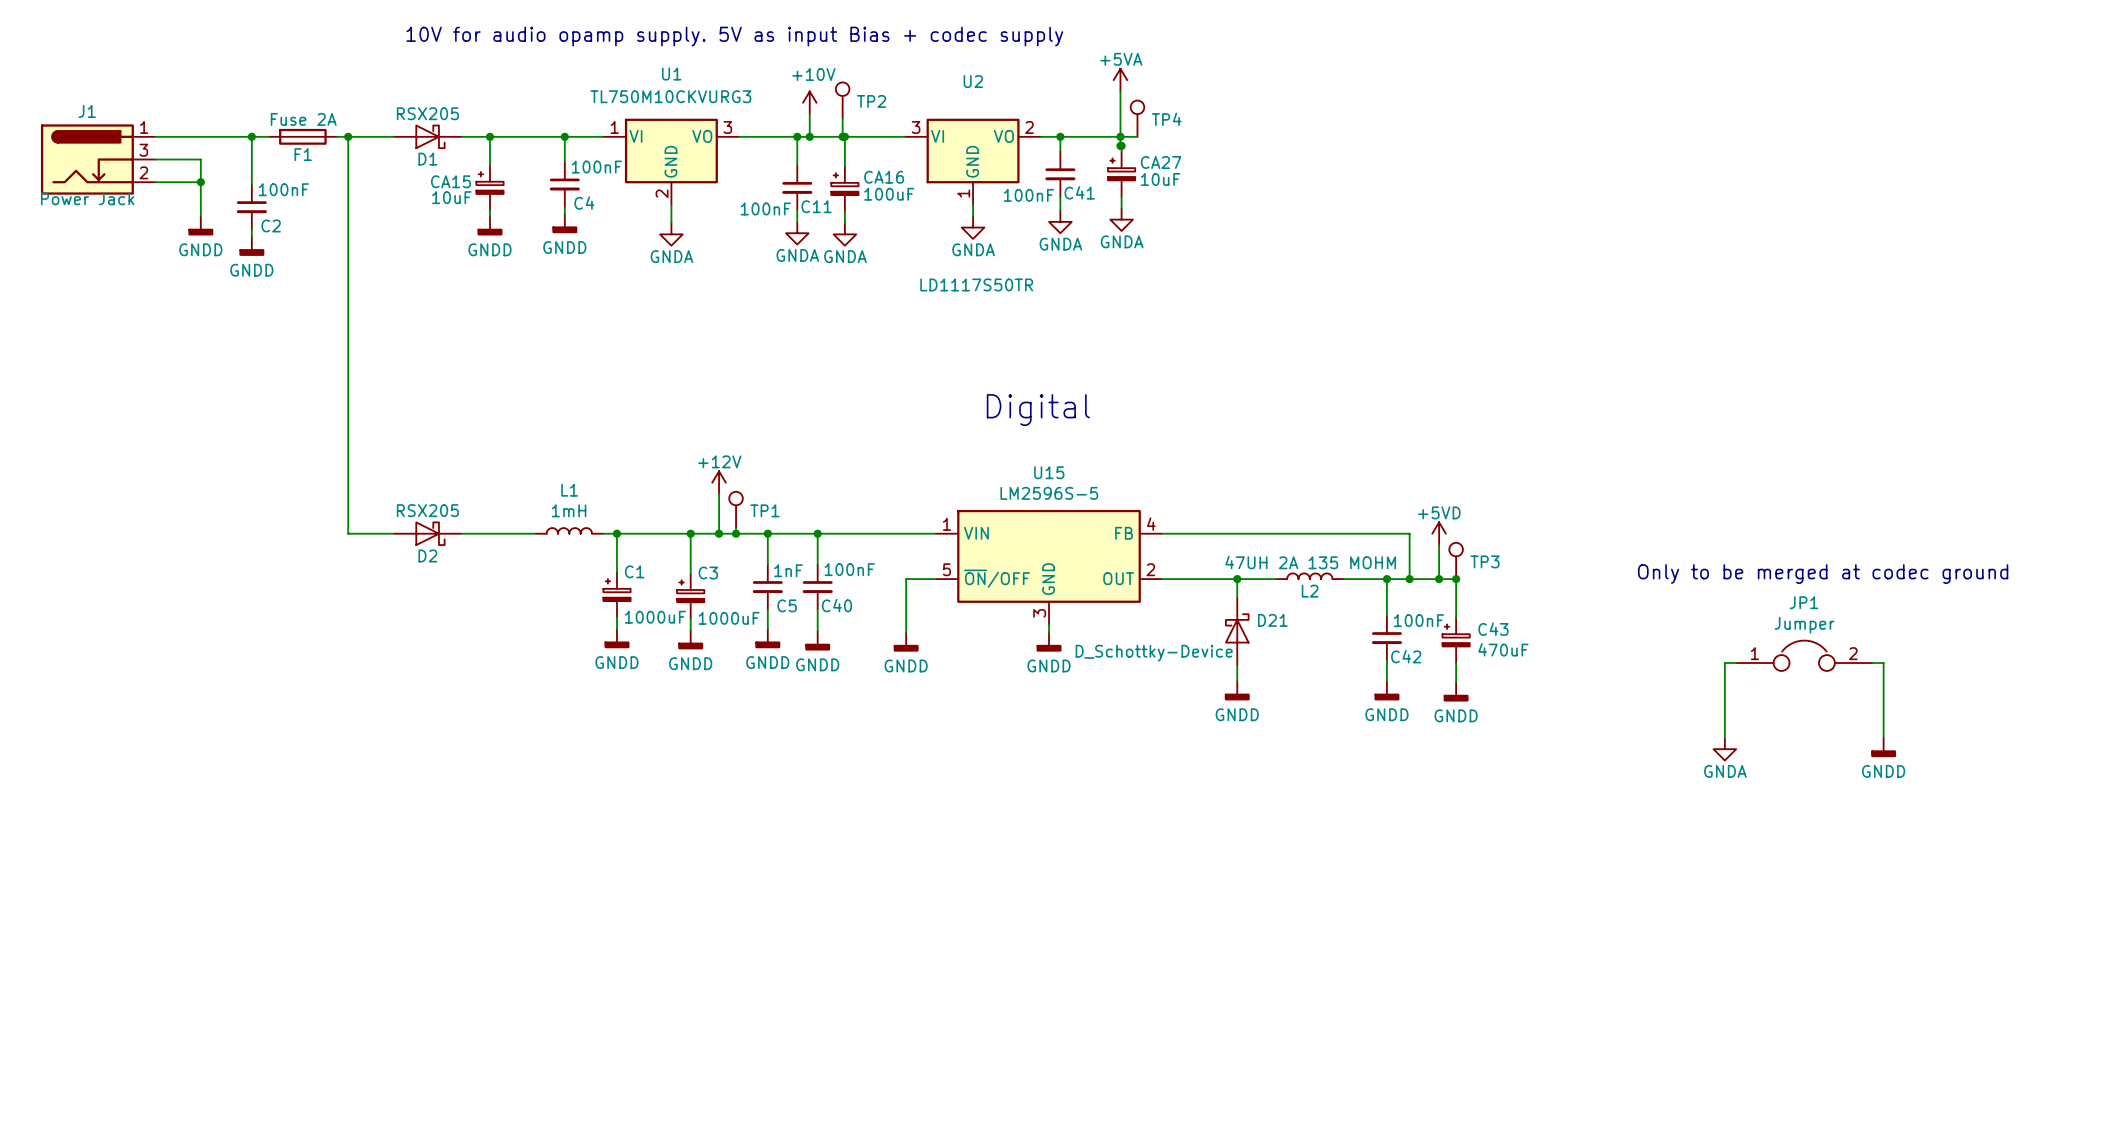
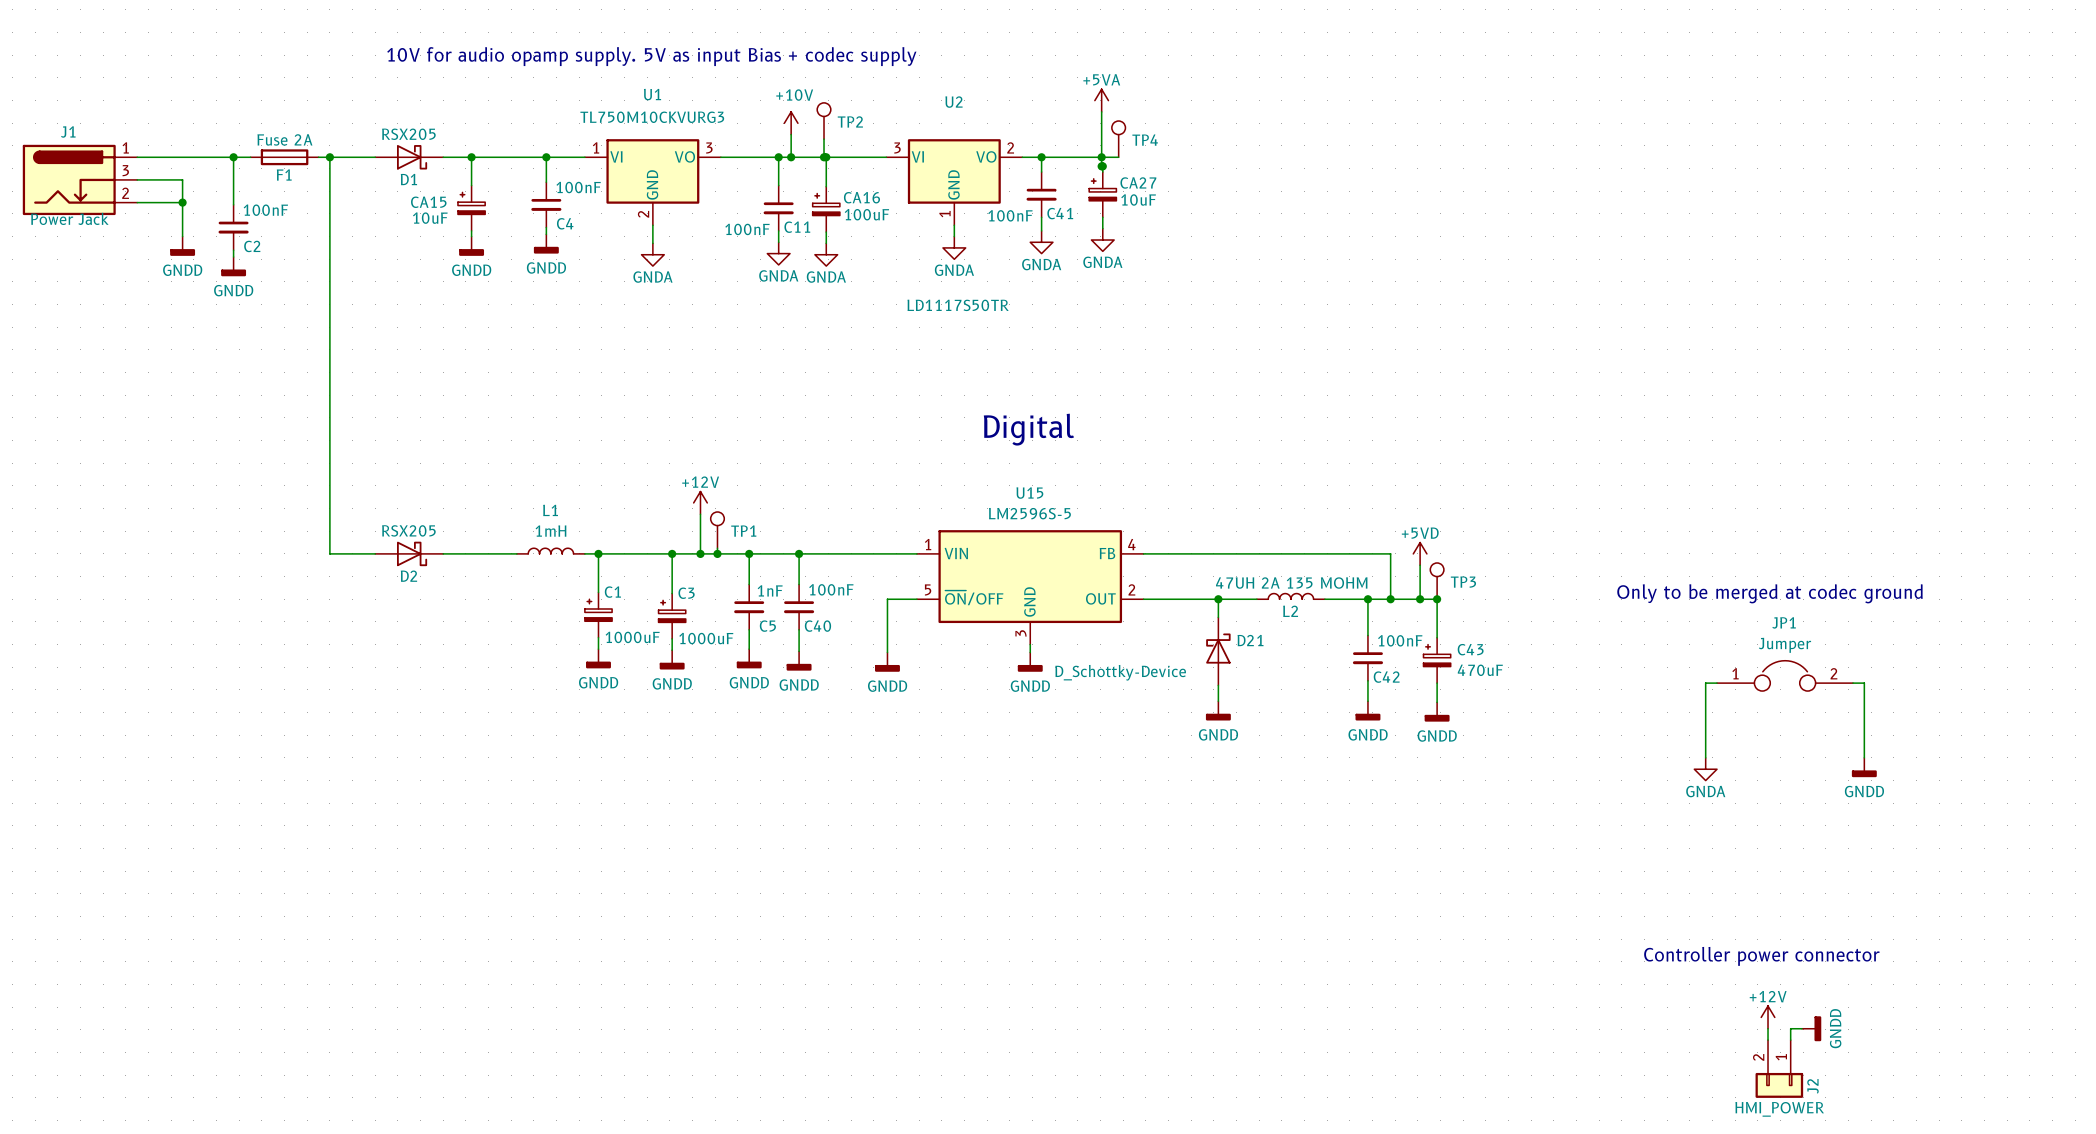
text: none -> Controller power connector (1761, 956)
power symbol: none -> +12V (1768, 1017)
wire: none -> (1768, 1028) (1768, 1040)
wire: none -> (1802, 1028) (1790, 1028) (1790, 1040)
power symbol: none -> GNDD (1811, 1028)
J2: none -> HMI_POWER (1779, 1068)

